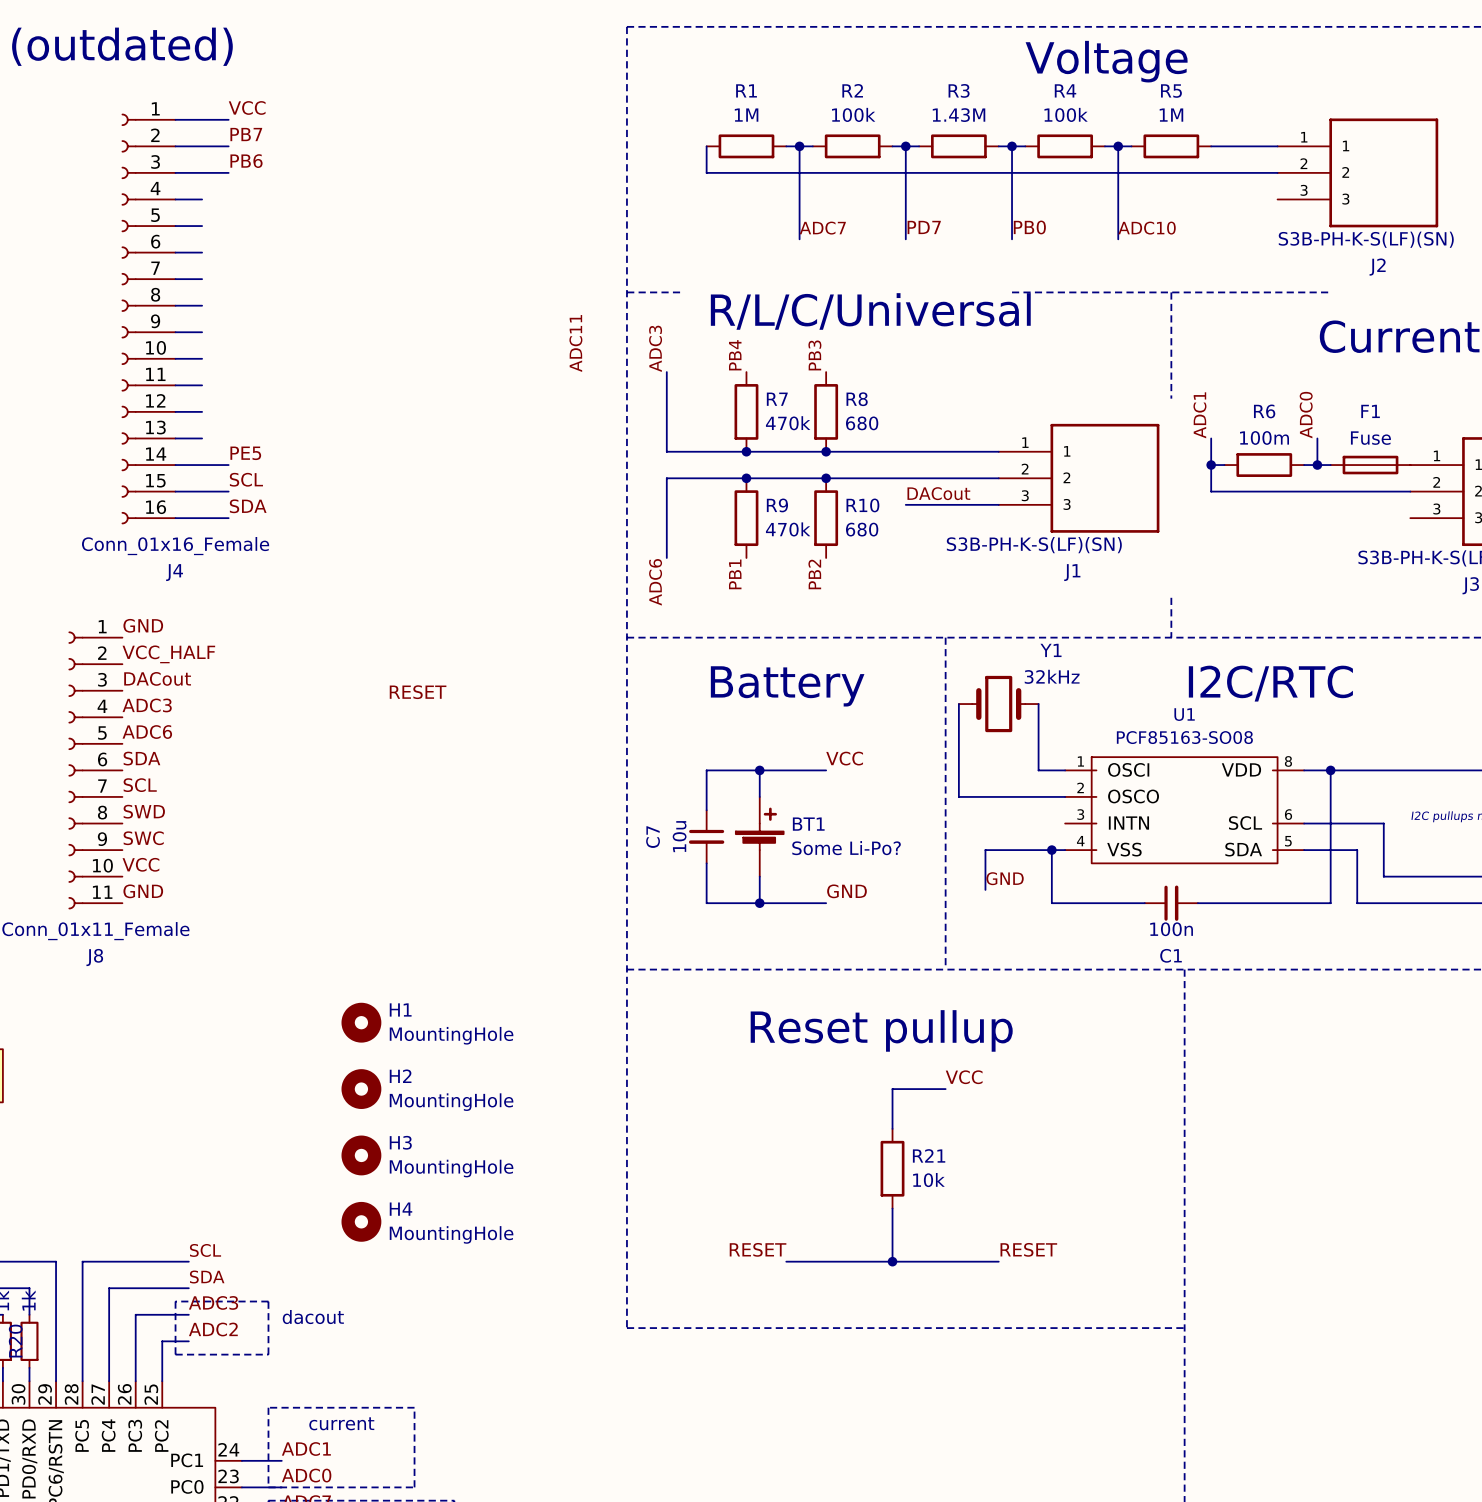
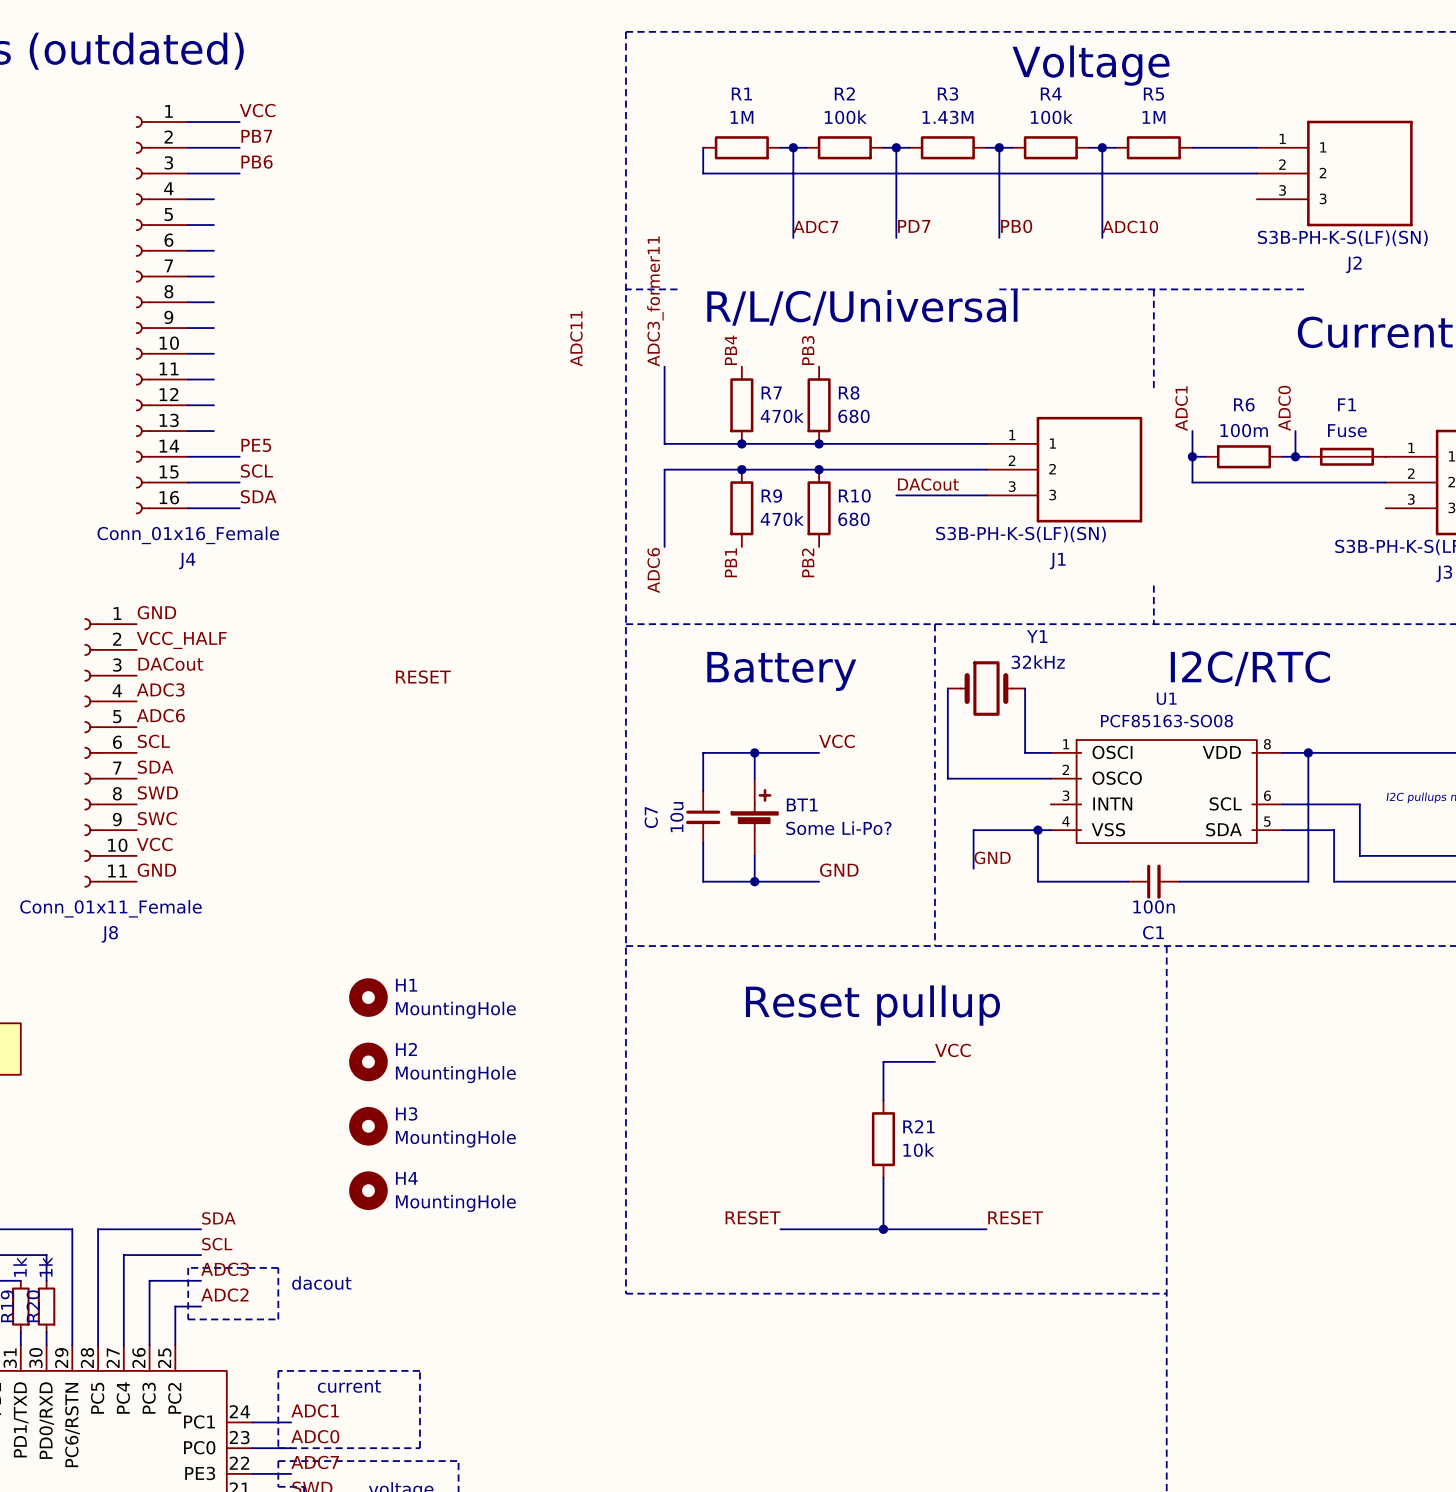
label: ADC3 (655, 348) -> ADC3_former11 (655, 301)
label: SDA (141, 758) -> SCL (153, 741)
label: SCL (140, 785) -> SDA (155, 767)
label: SCL (205, 1250) -> SDA (218, 1218)
label: SDA (207, 1277) -> SCL (217, 1244)

